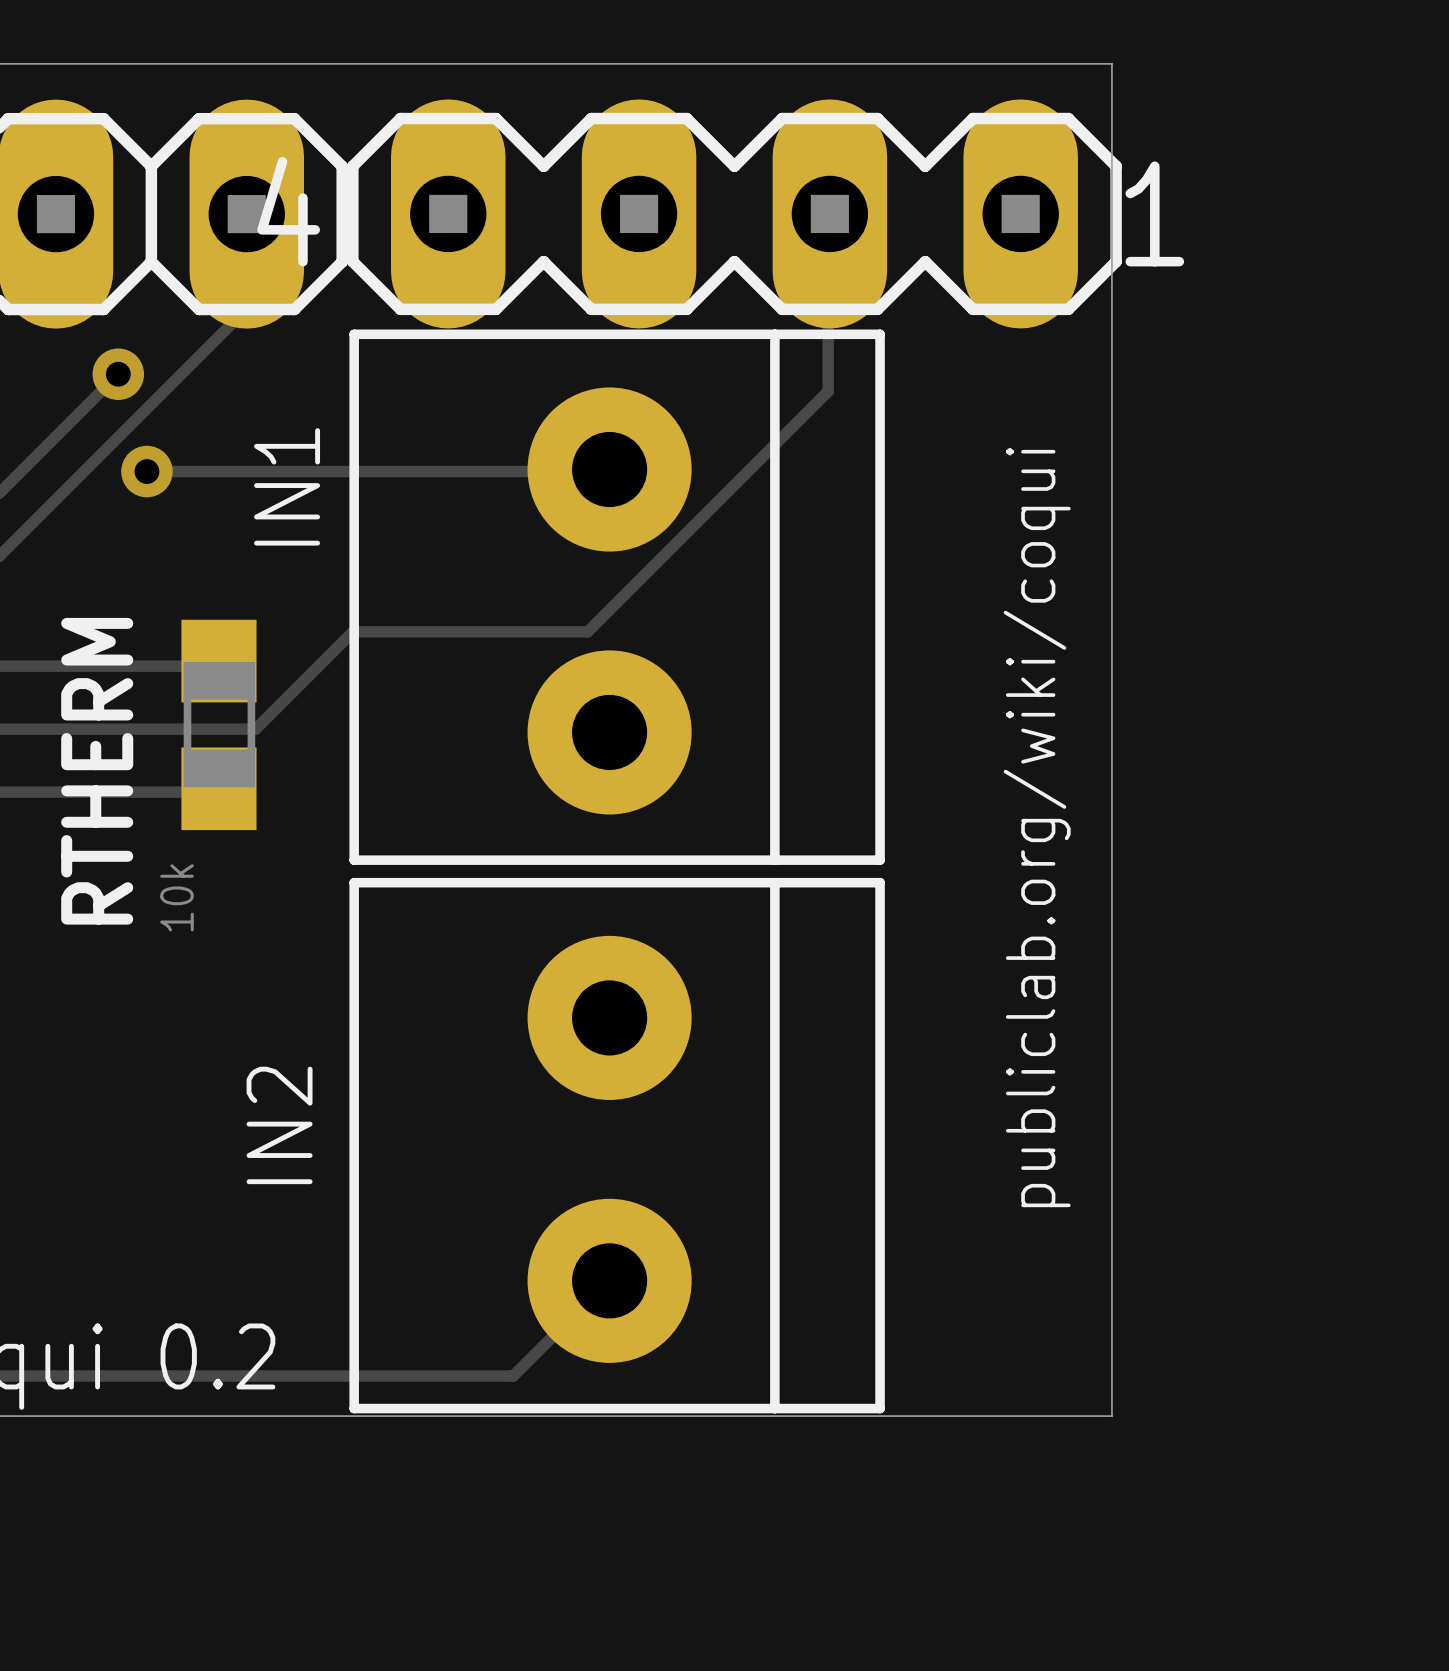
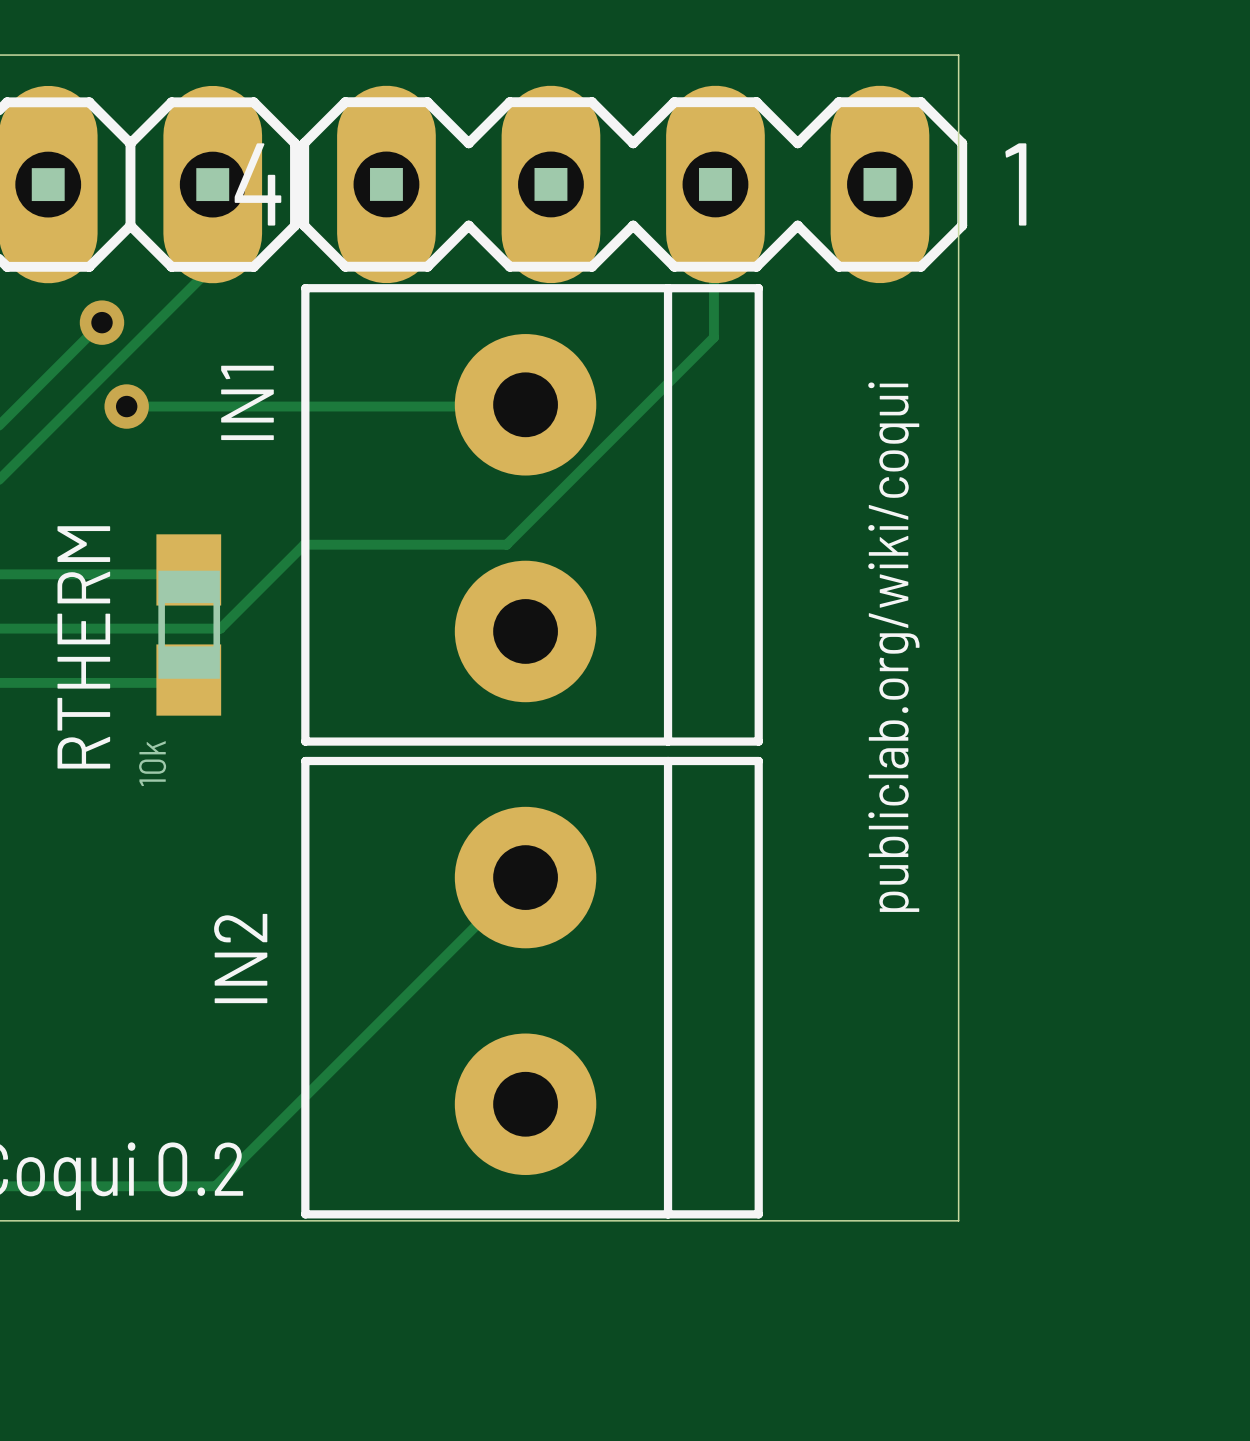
track: (609, 1280) (513, 1376) (249, 1376) -> (525, 877) (215, 1186)

